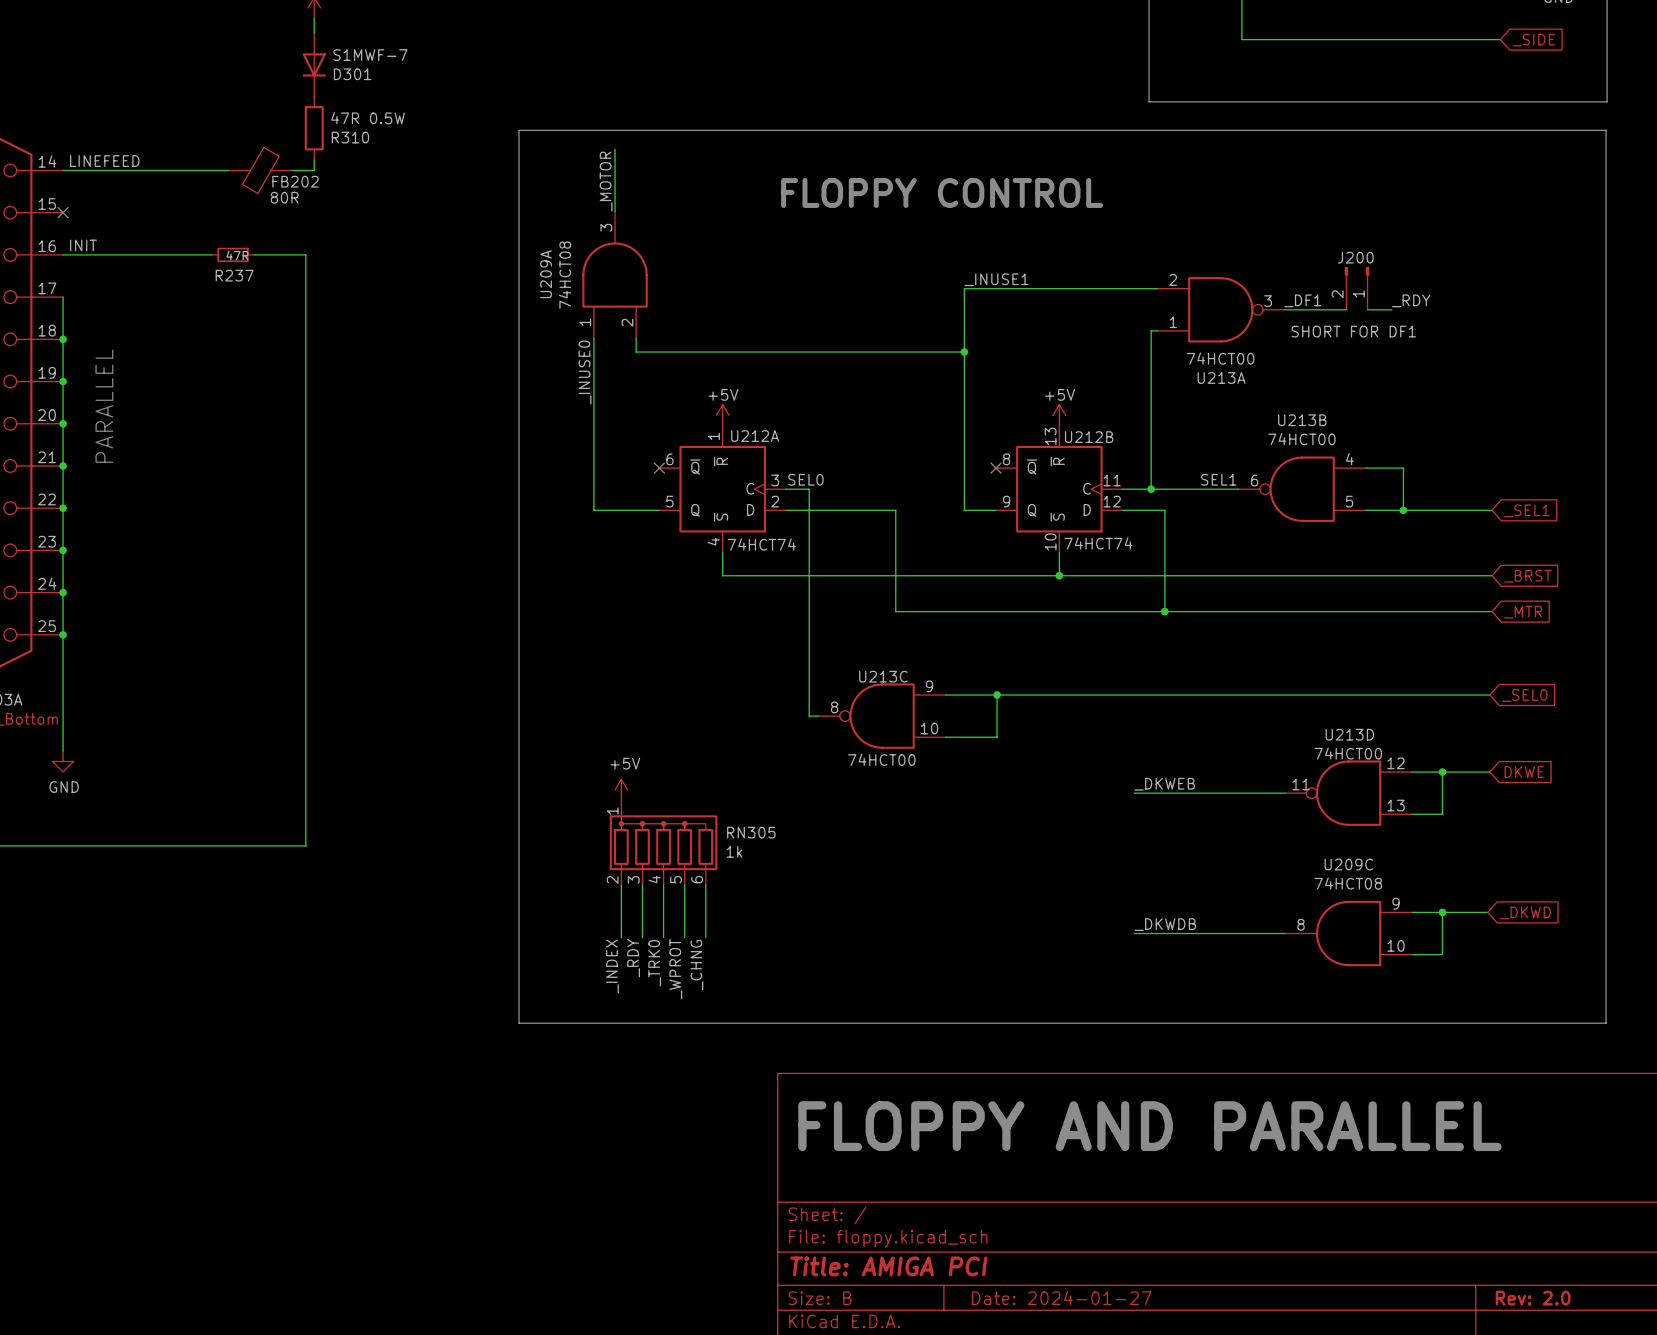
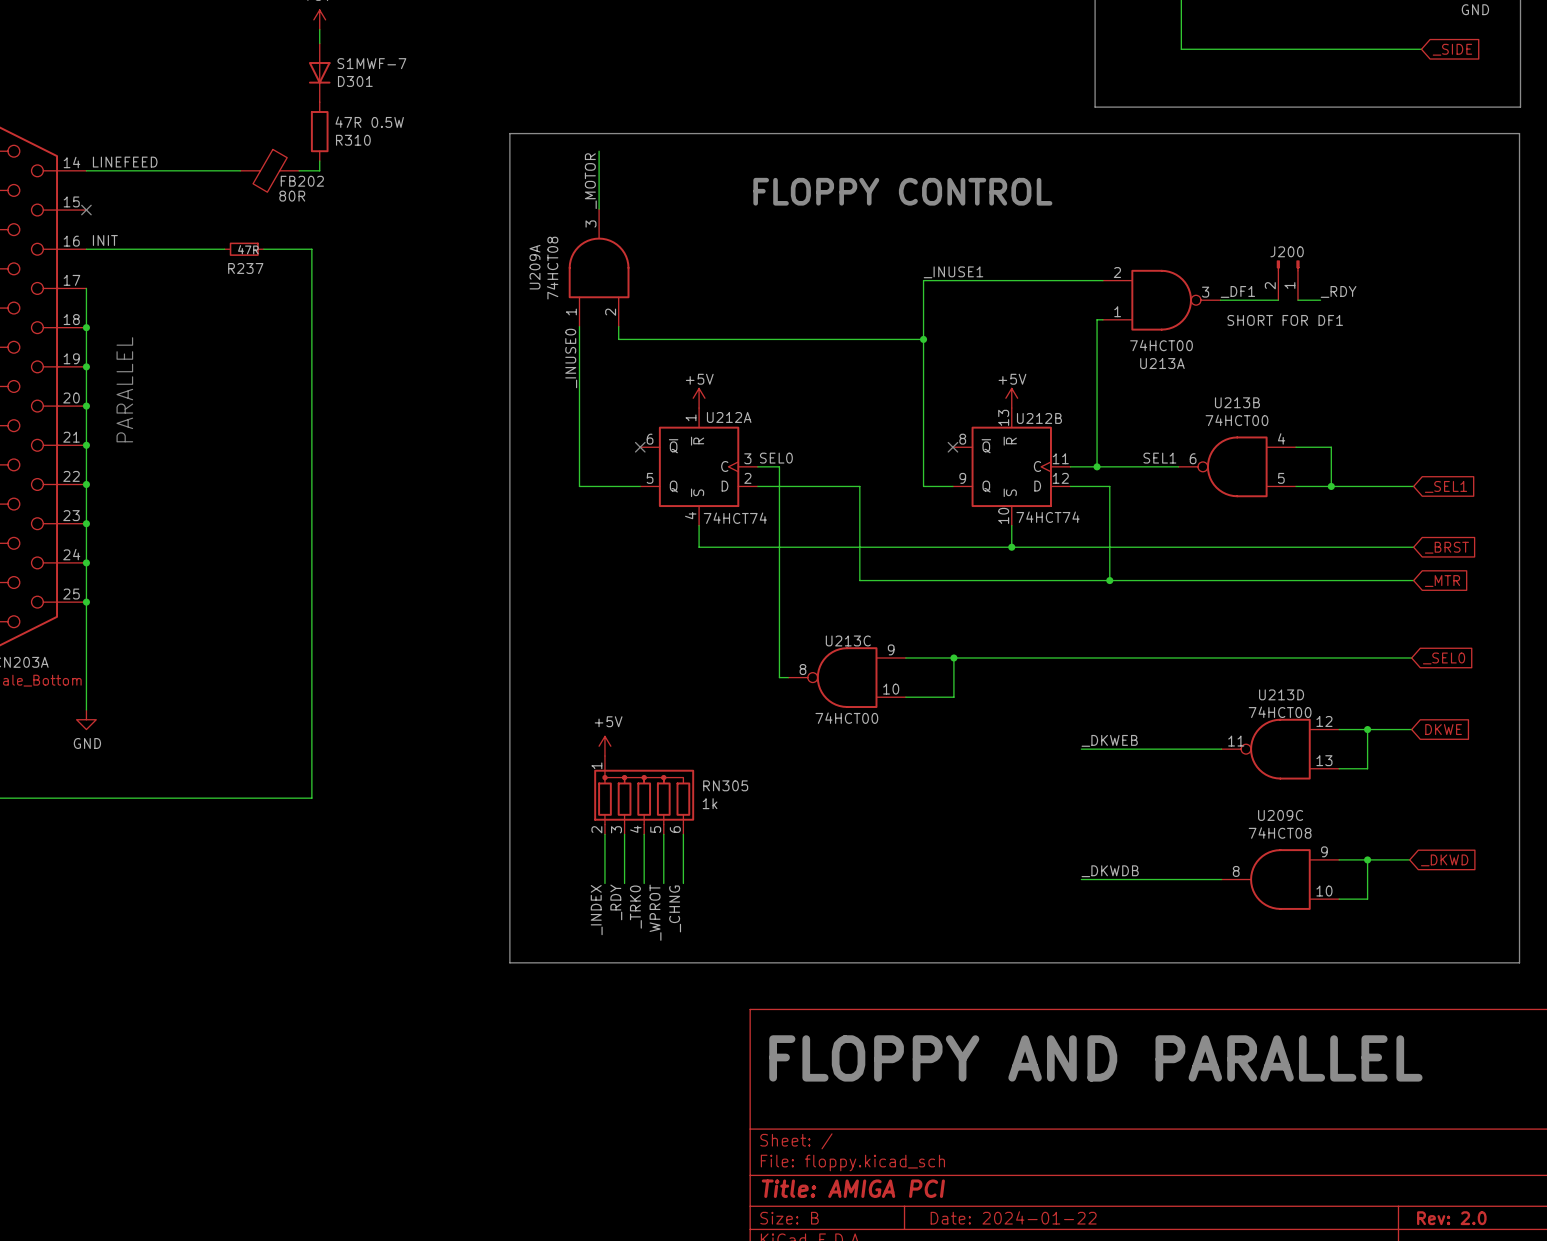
title block: Date: 2024-01-27 (1061, 1297) -> Date: 2024-01-22 (1013, 1217)

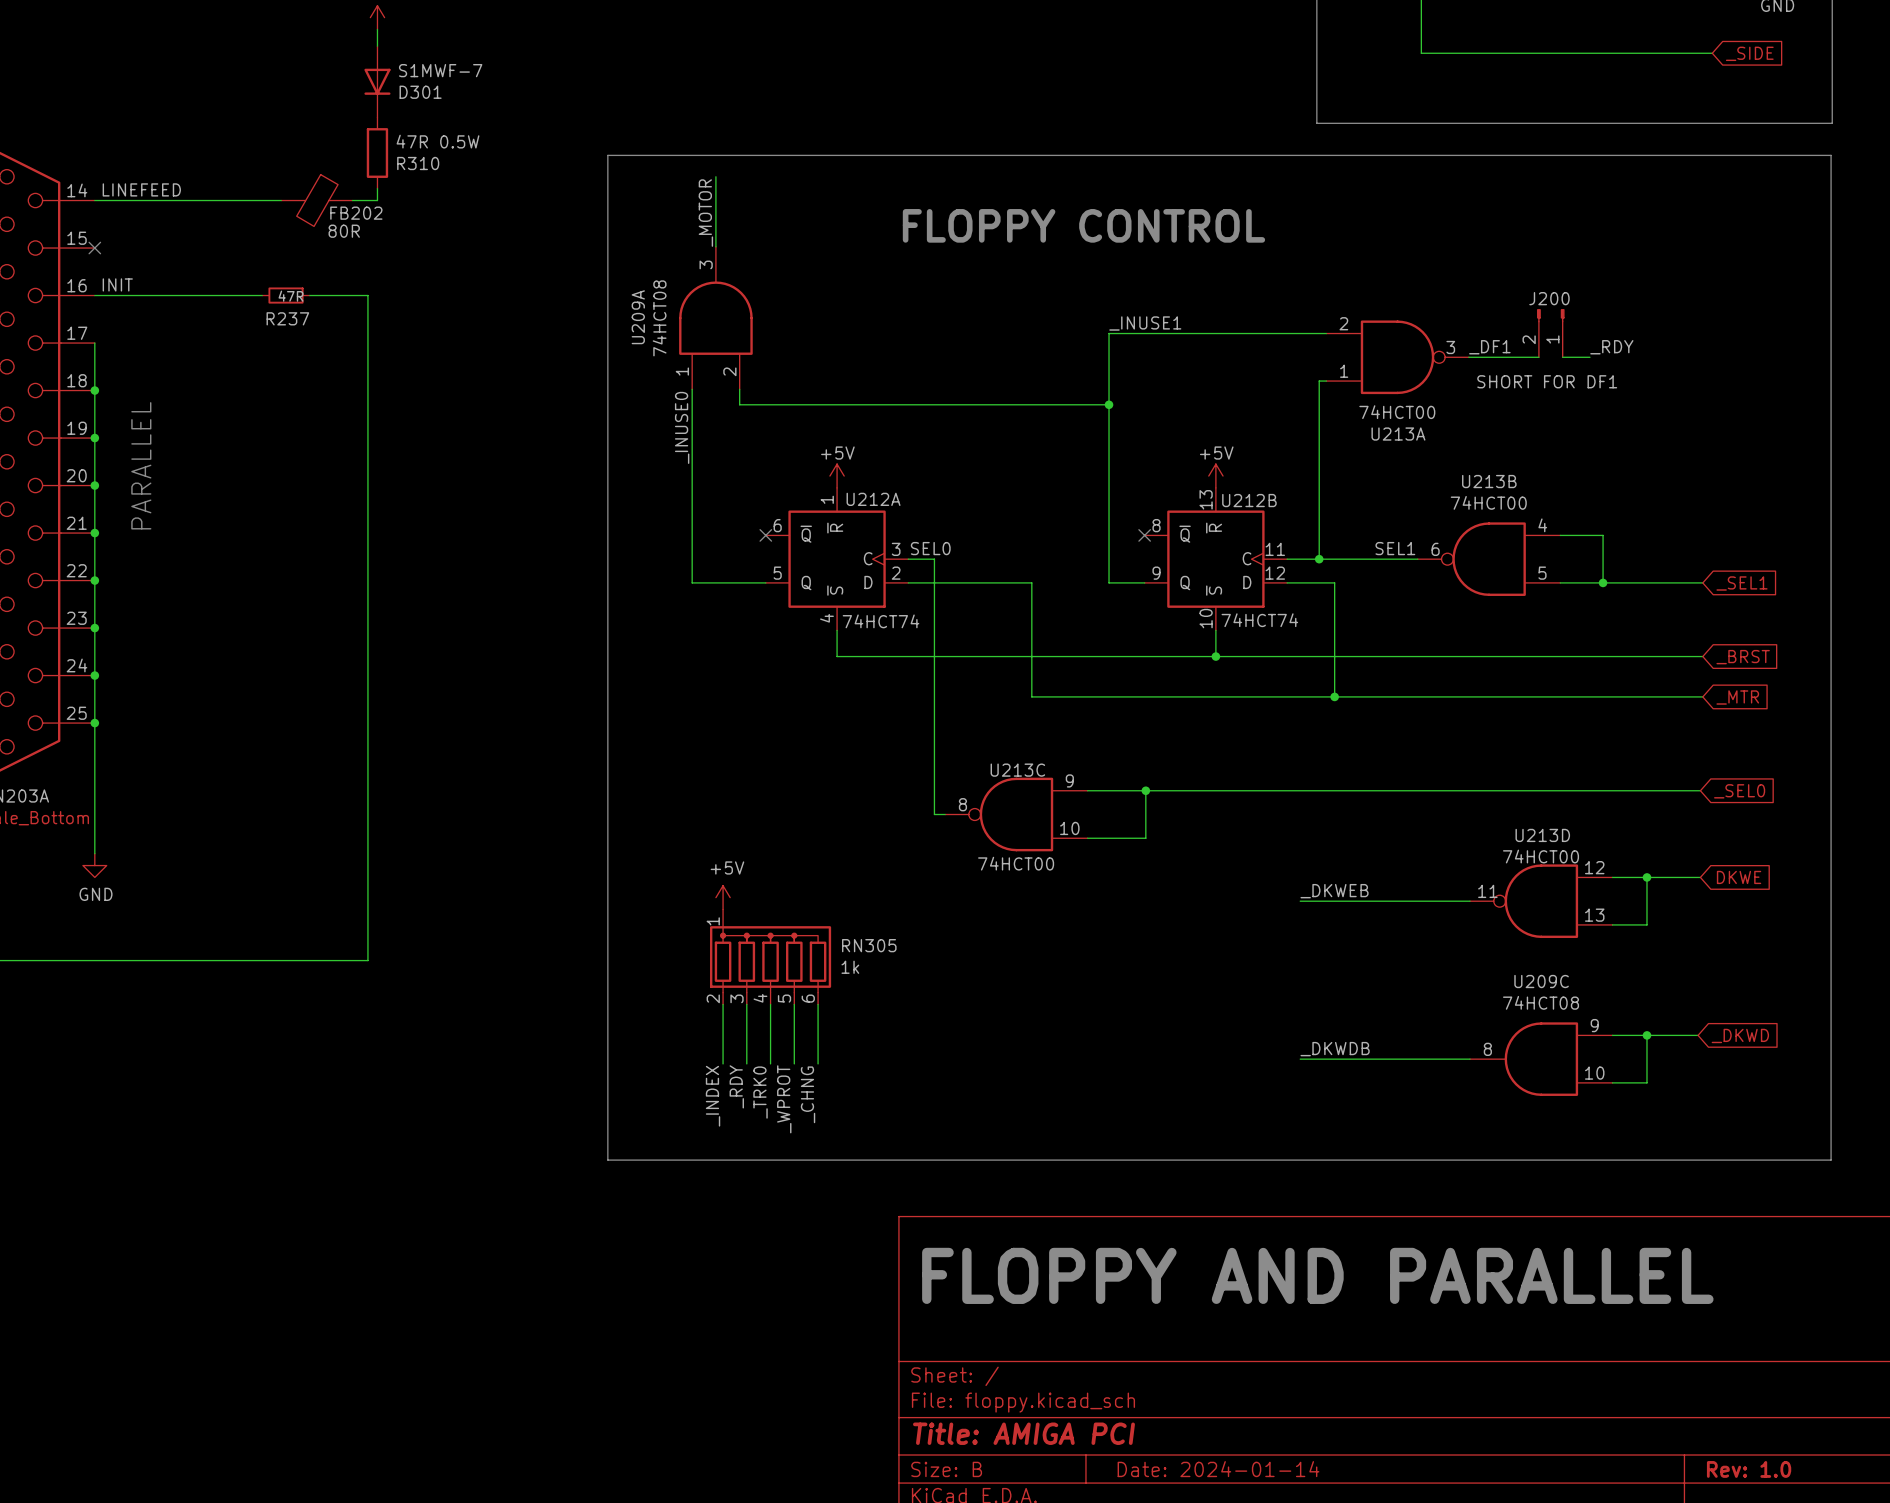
title block: Date: 2024-01-22 (1013, 1217) -> Date: 2024-01-14 (1218, 1469)
title block: Rev: 2.0 (1451, 1218) -> Rev: 1.0 (1749, 1469)

